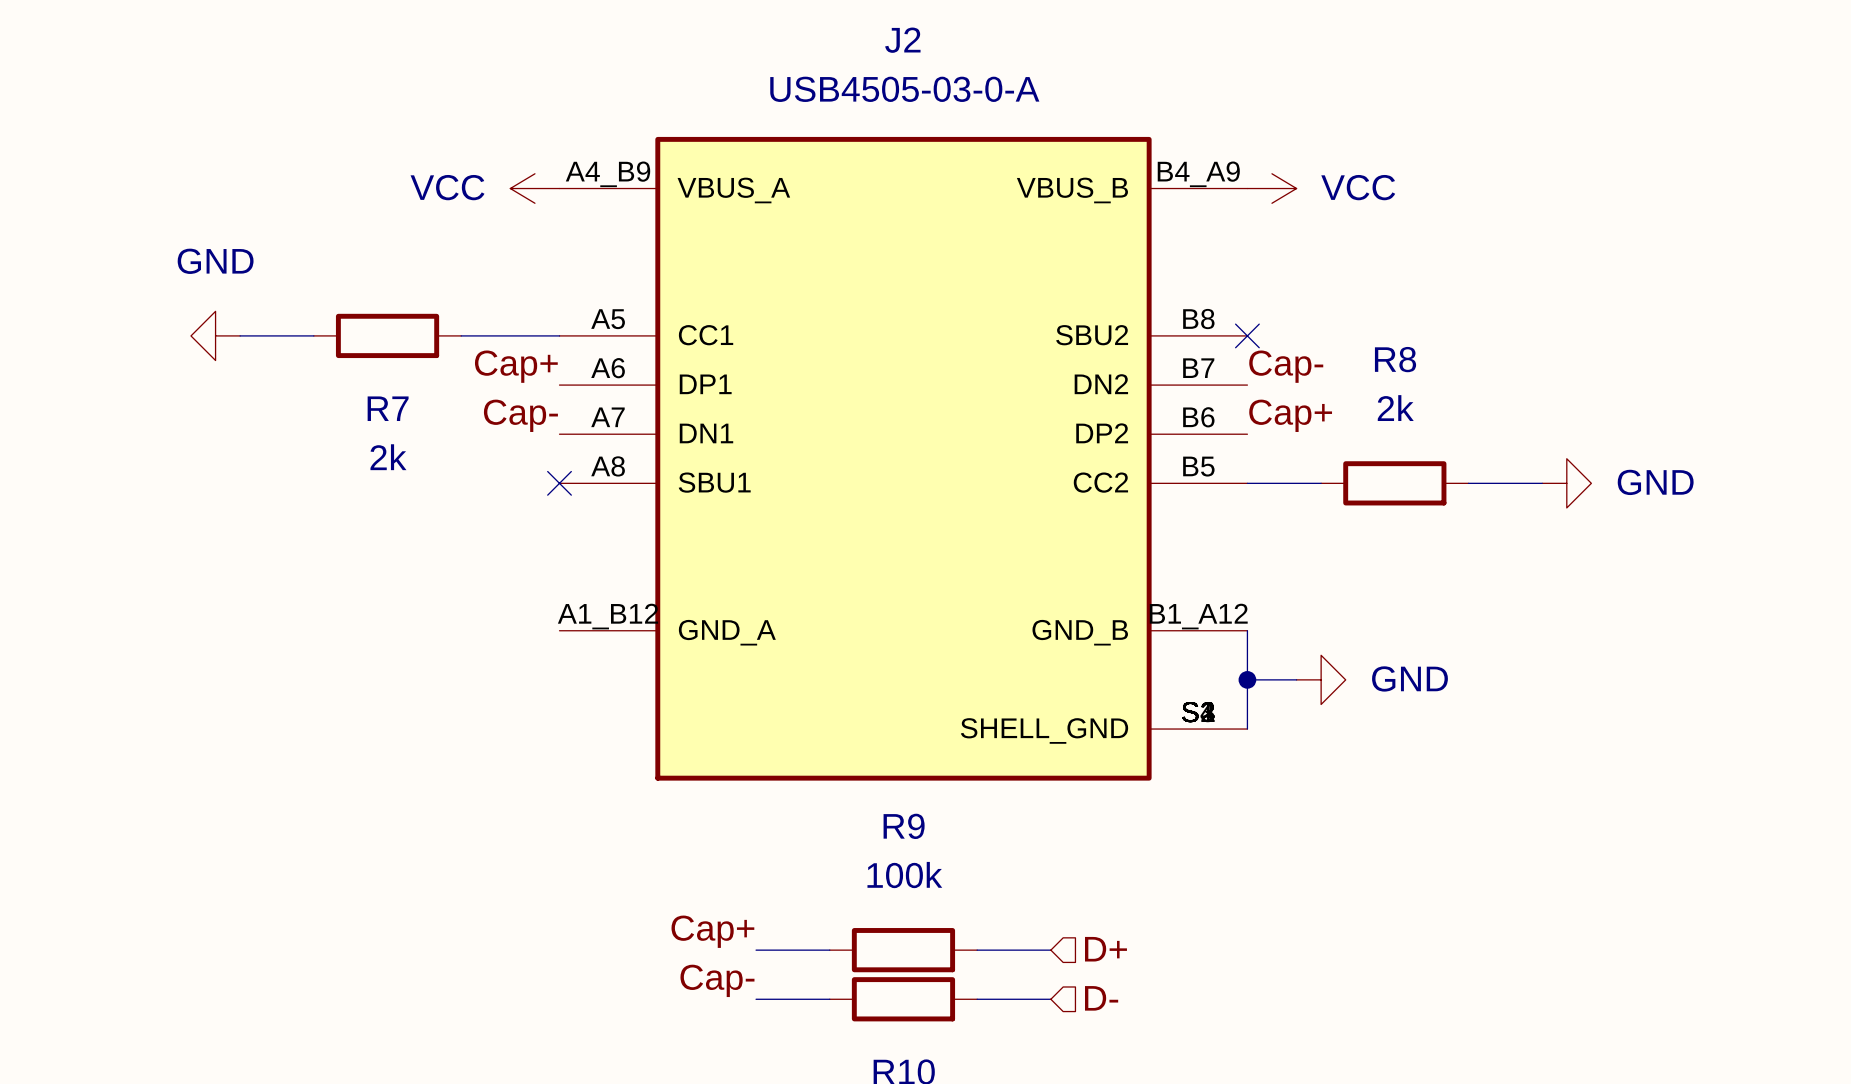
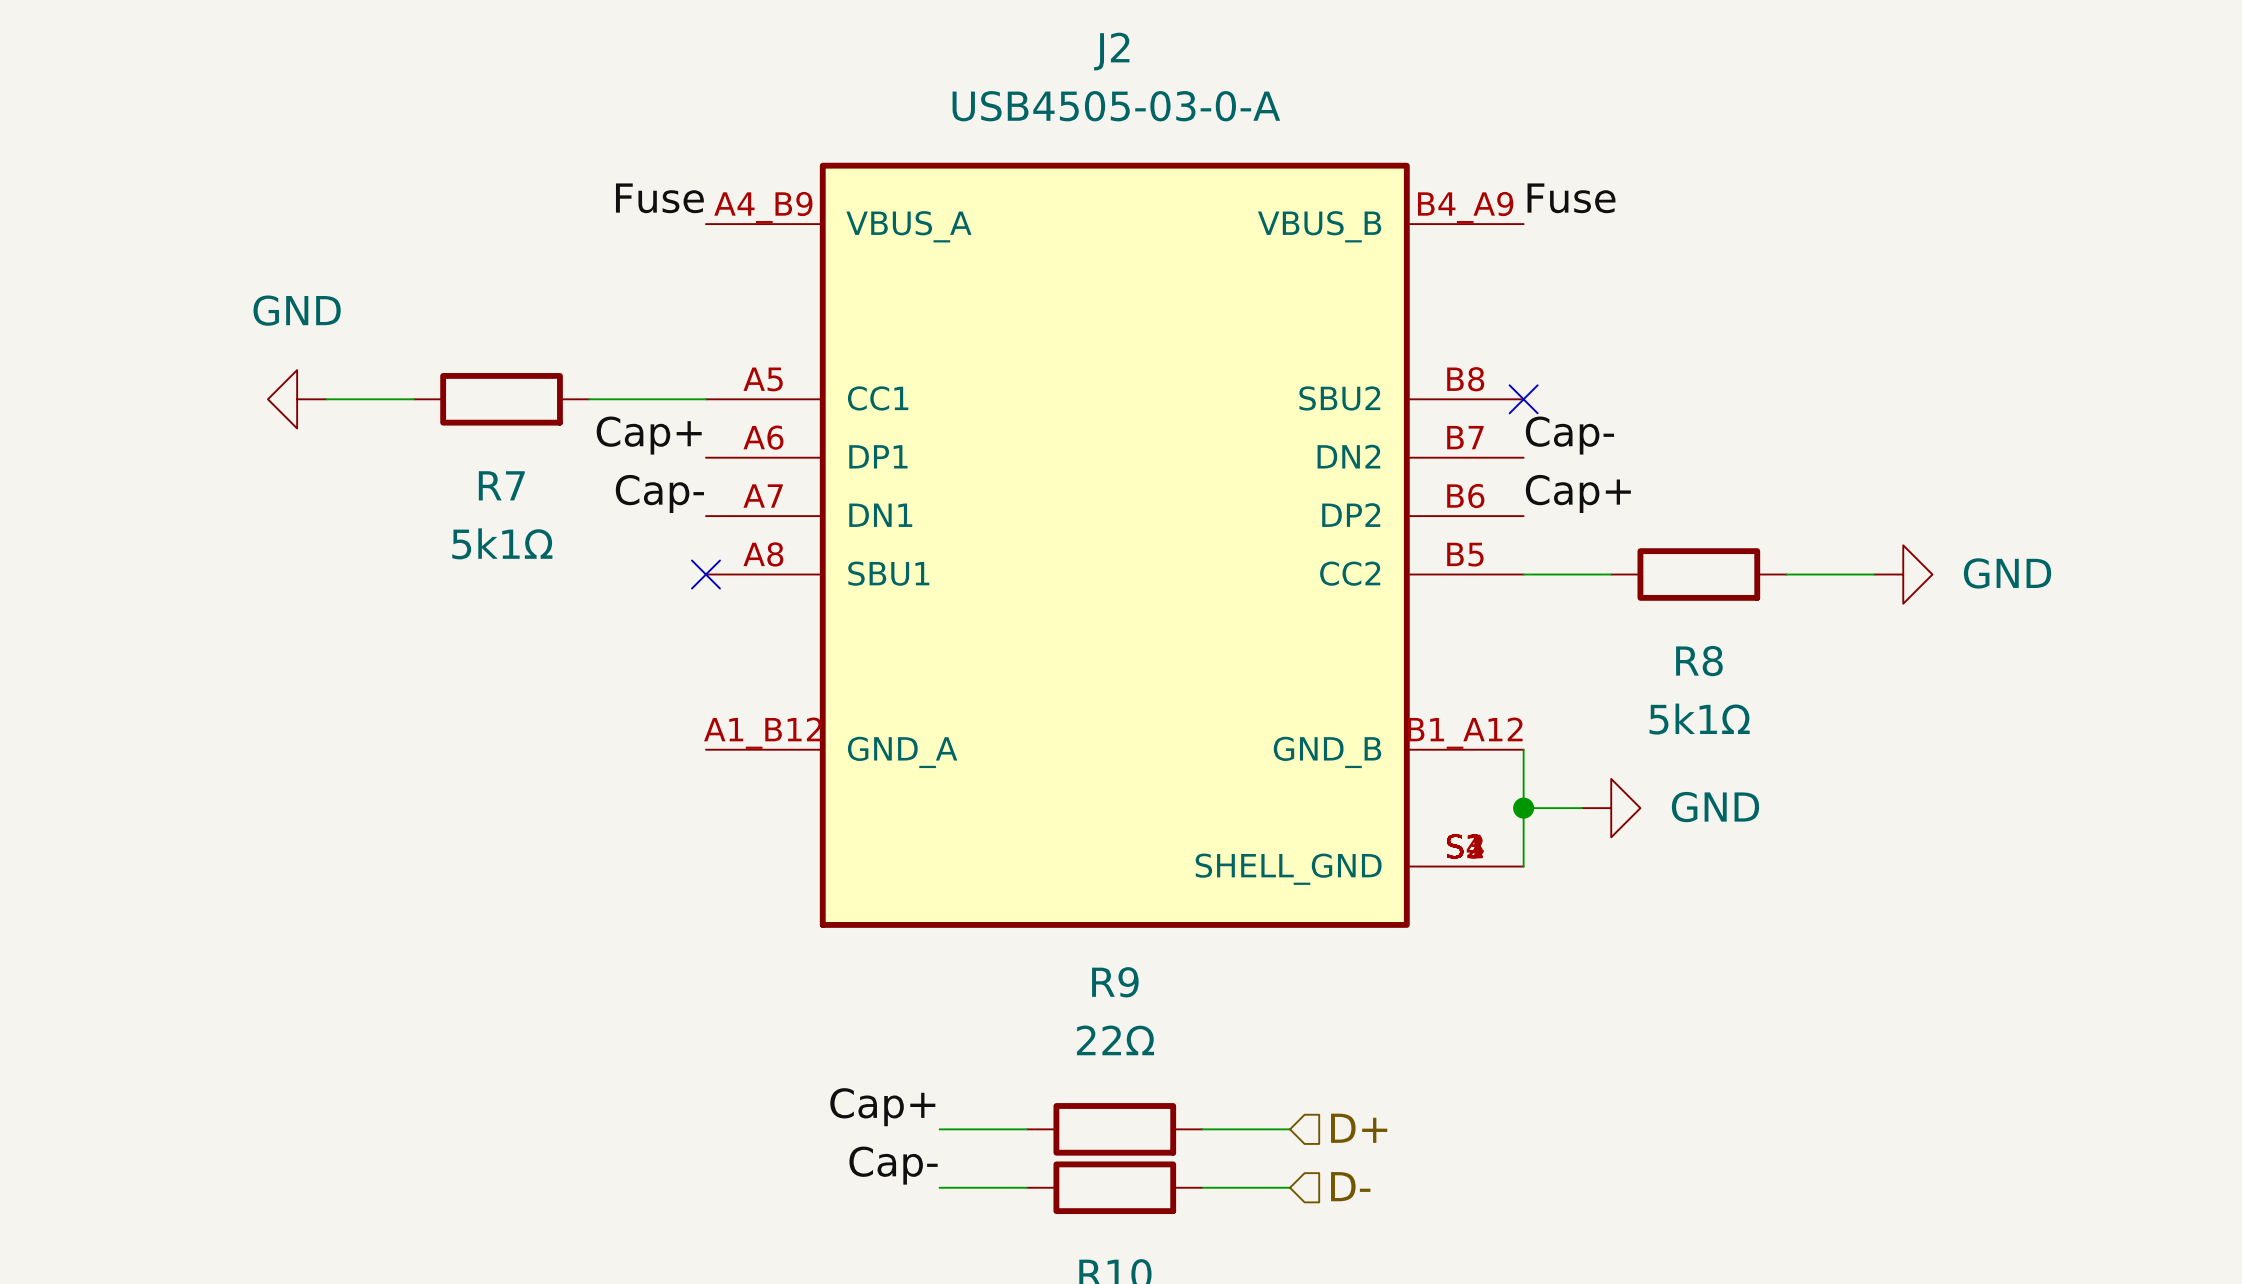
label: none -> Fuse (659, 198)
label: none -> Fuse (1571, 198)
power symbol: VCC (534, 188) -> none
power symbol: VCC (1271, 188) -> none
R8 name position: R8 (1395, 359) -> R8 (1699, 661)
R8 value: 2k (1395, 408) -> 5k1Ω (1699, 719)
R7 value: 2k (388, 457) -> 5k1Ω (502, 543)
R9 value: 100k (904, 875) -> 22Ω (1115, 1040)

